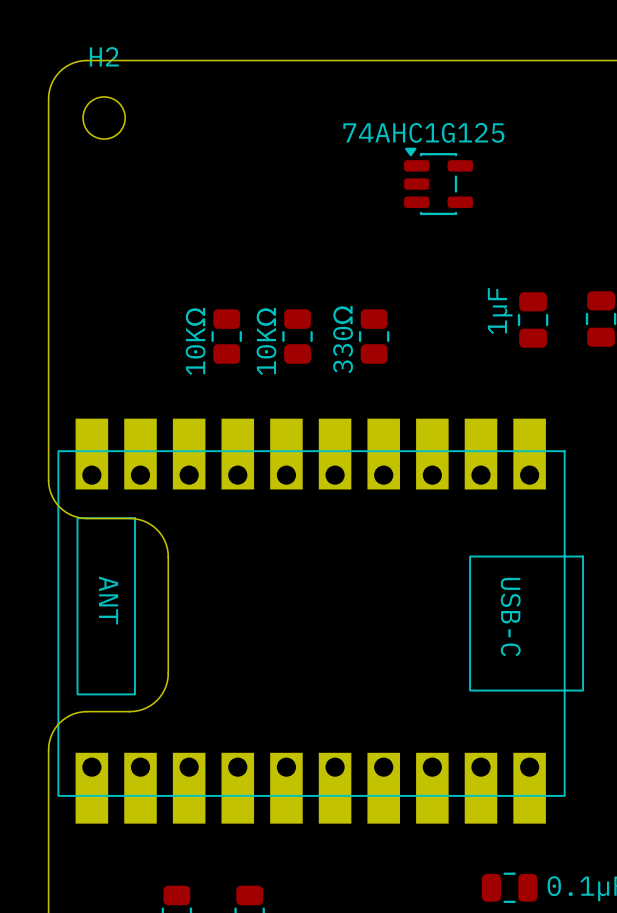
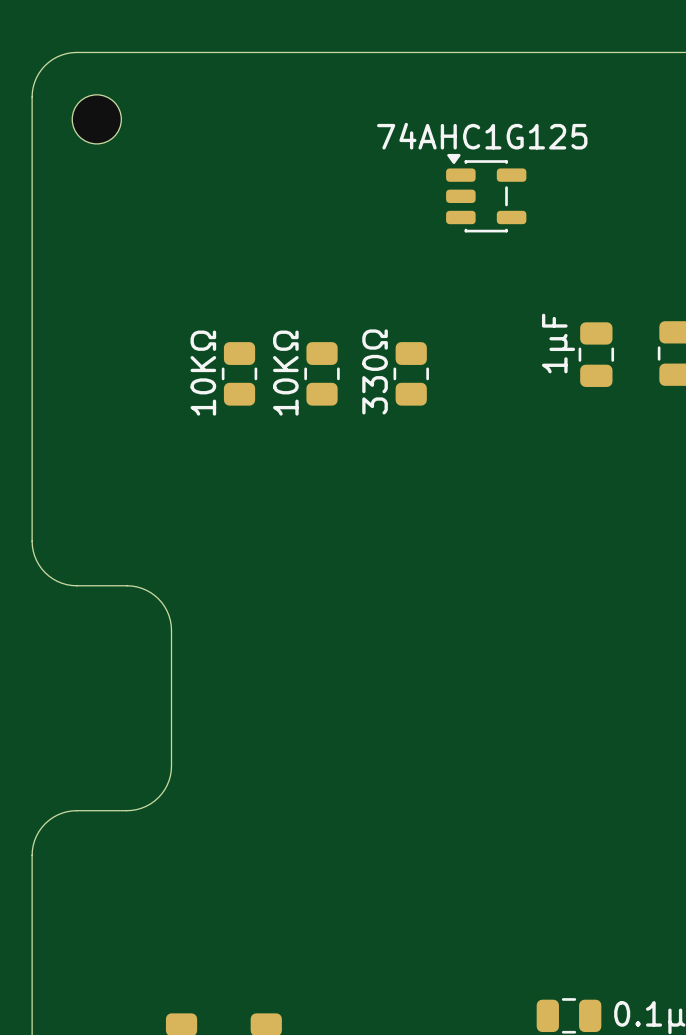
H2 name: H2 (104, 56) -> none
part: (320, 621) -> none

